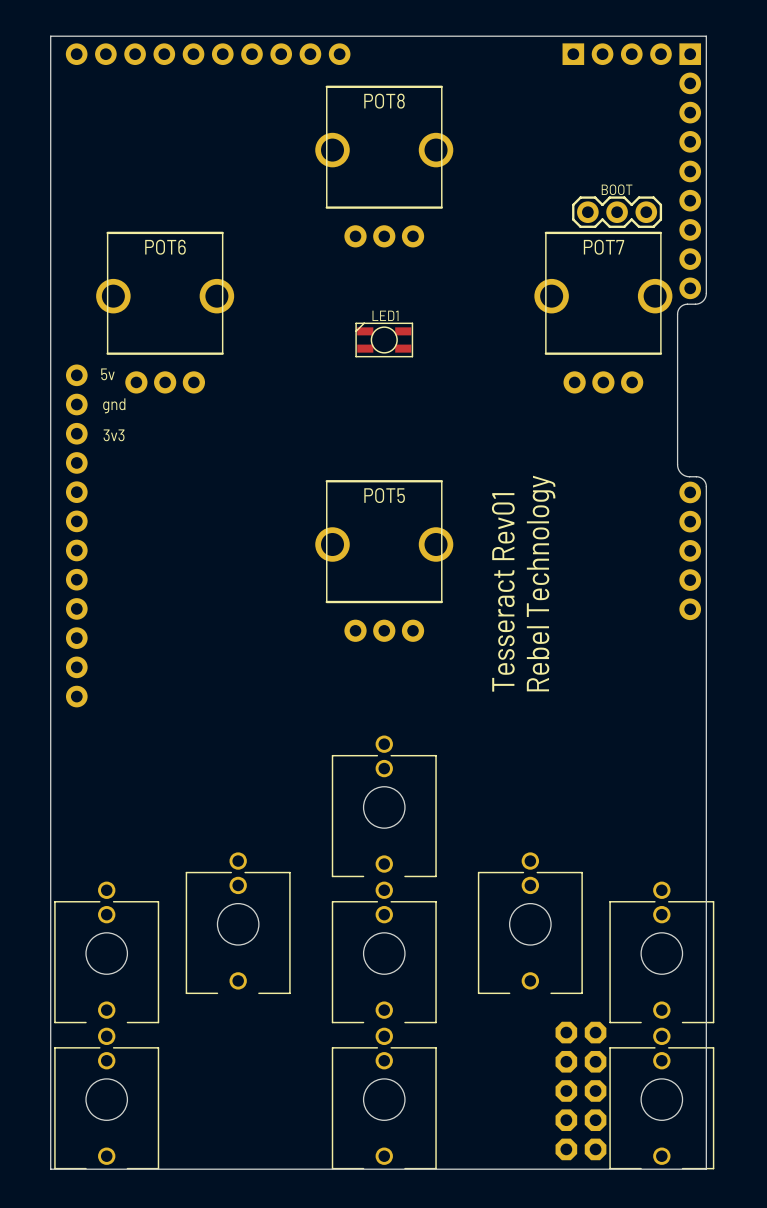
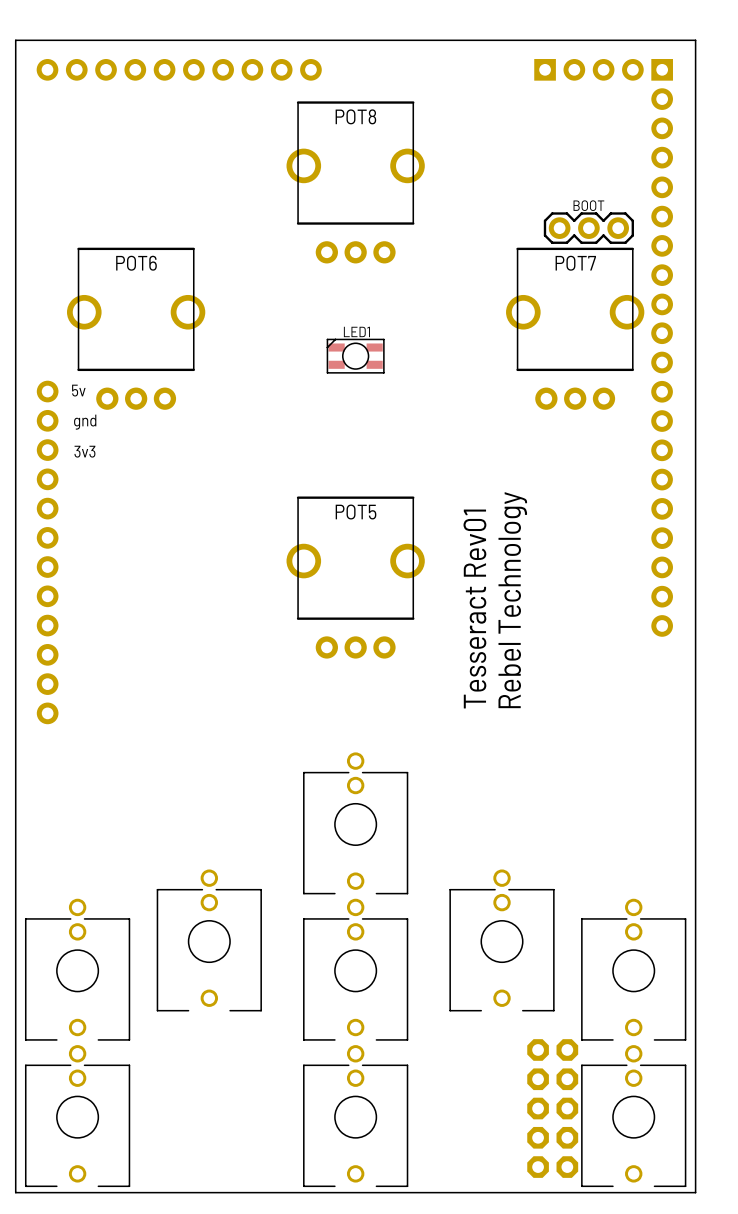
board edge: (50, 36) (706, 36) (706, 294) (699, 303) (681, 306) (677, 314) (677, 466) (683, 475) (702, 478) (706, 486) (706, 1169) (50, 1169) (50, 36) -> (15, 40) (15, 1192) (695, 1192) (695, 40) (15, 40)
part: none -> (662, 406)

